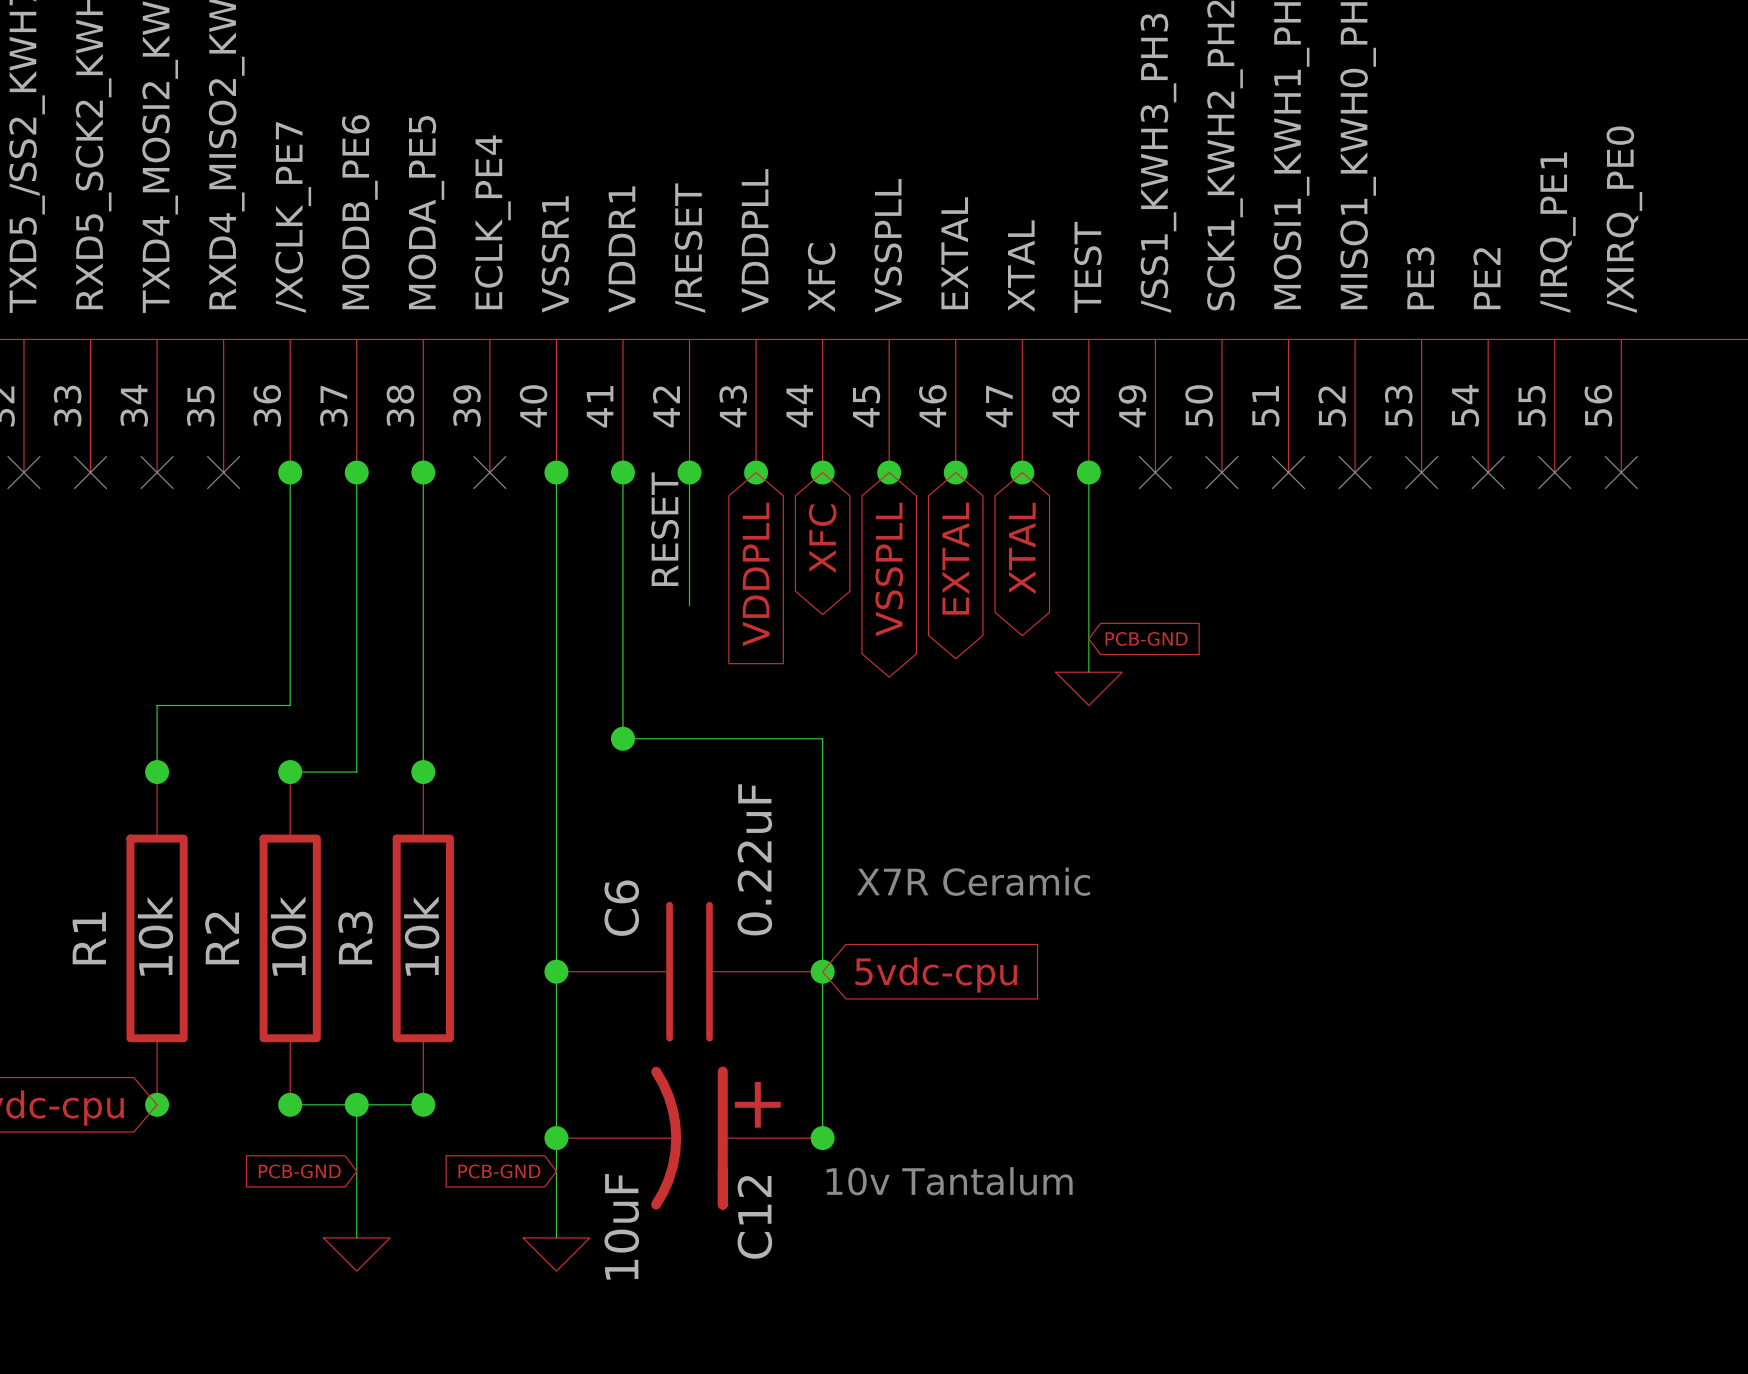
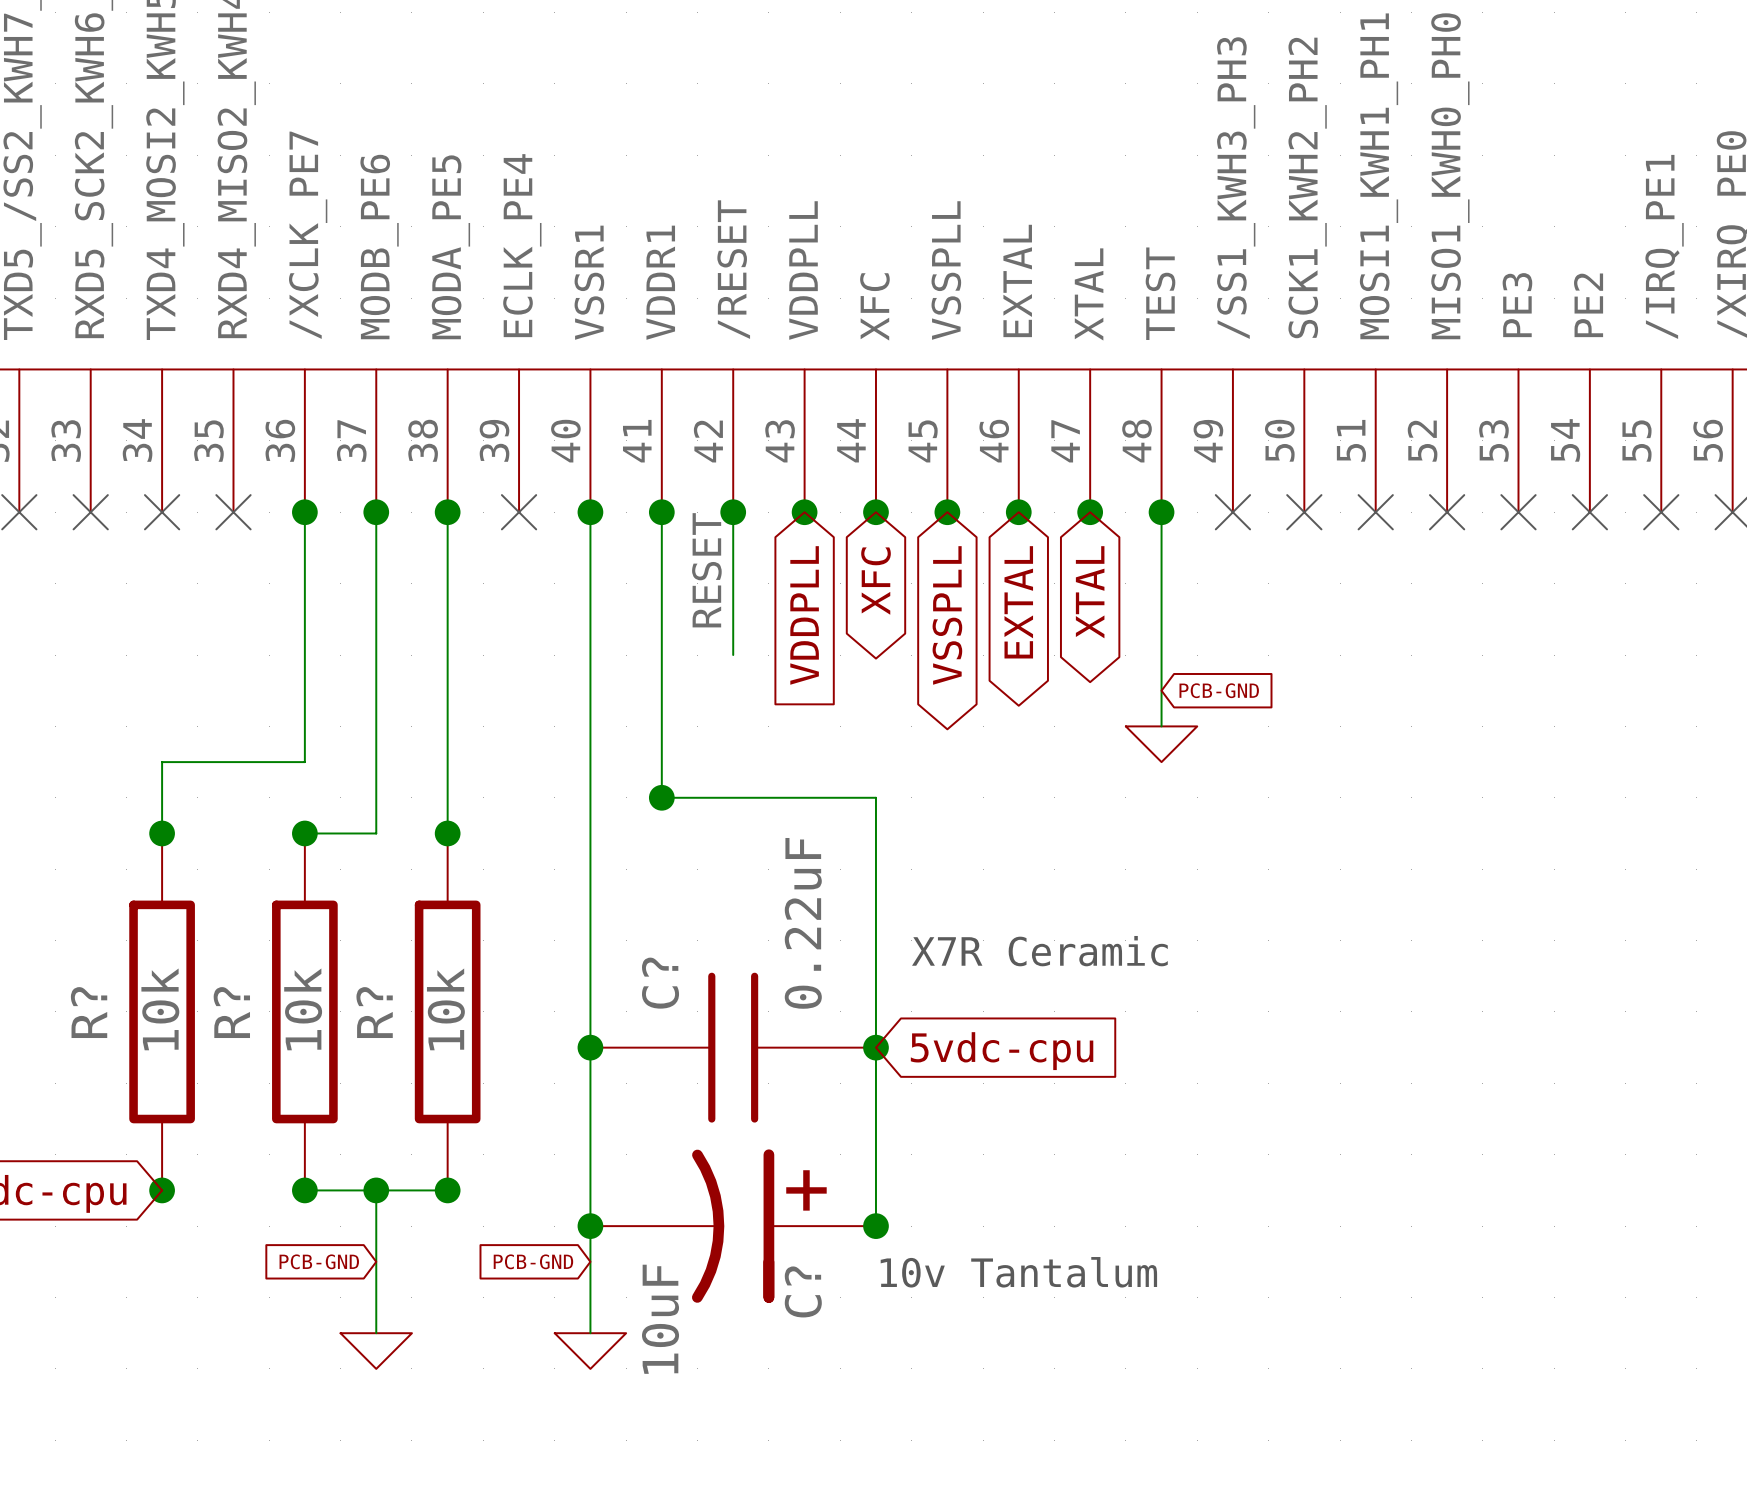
C6 name: C6 (621, 908) -> C? (660, 983)
R1 name: R1 (89, 938) -> R? (89, 1012)
R2 name: R2 (222, 938) -> R? (231, 1012)
R3 name: R3 (355, 938) -> R? (374, 1012)
C12 name: C12 (754, 1217) -> C? (803, 1291)

